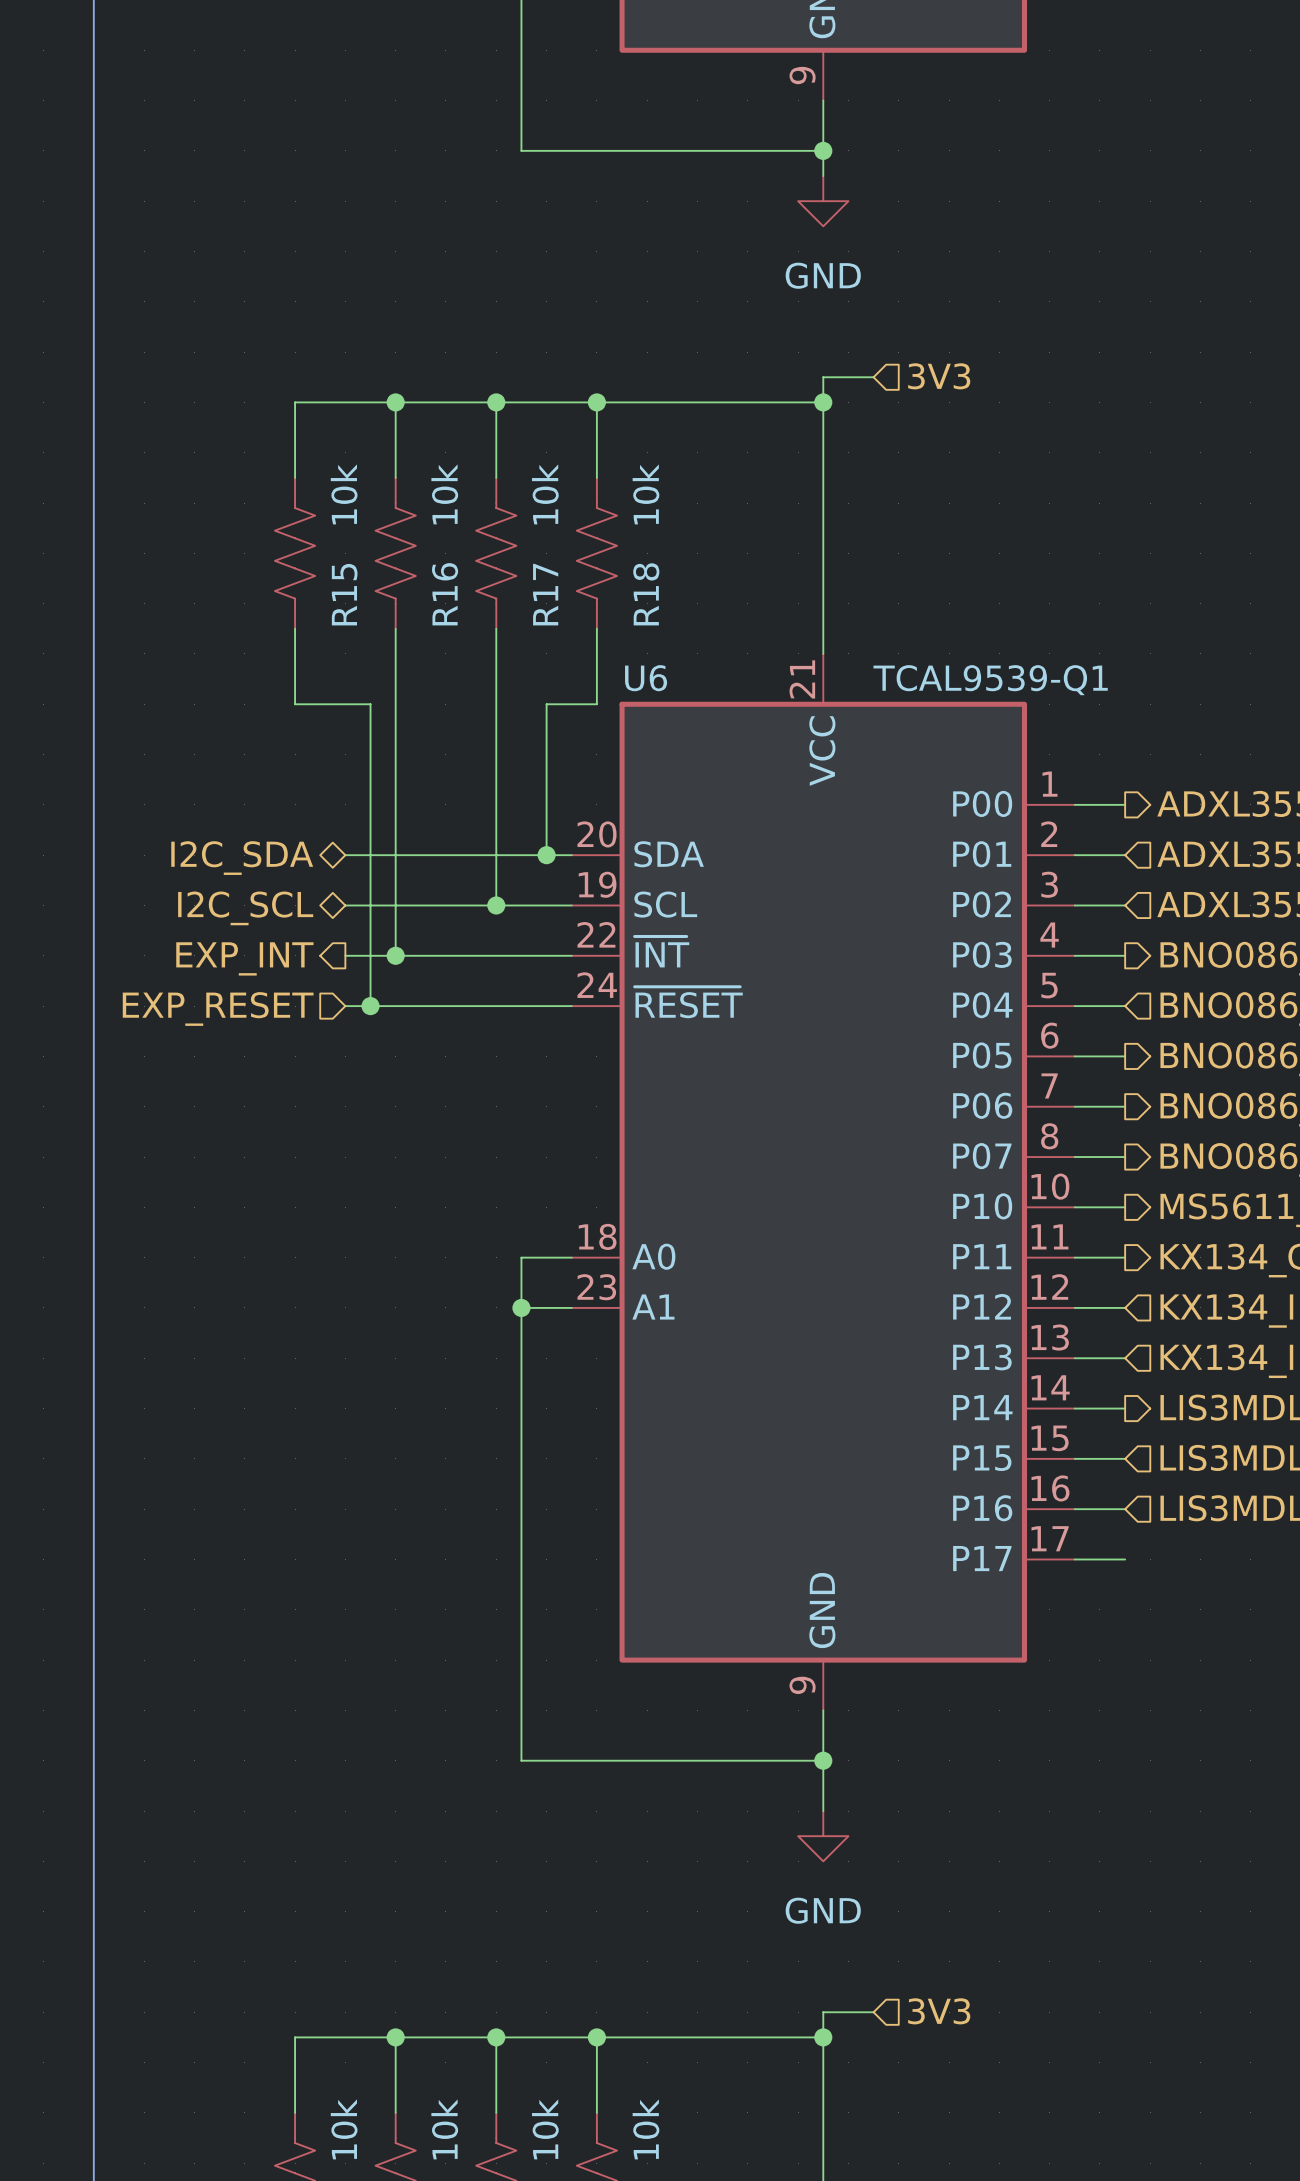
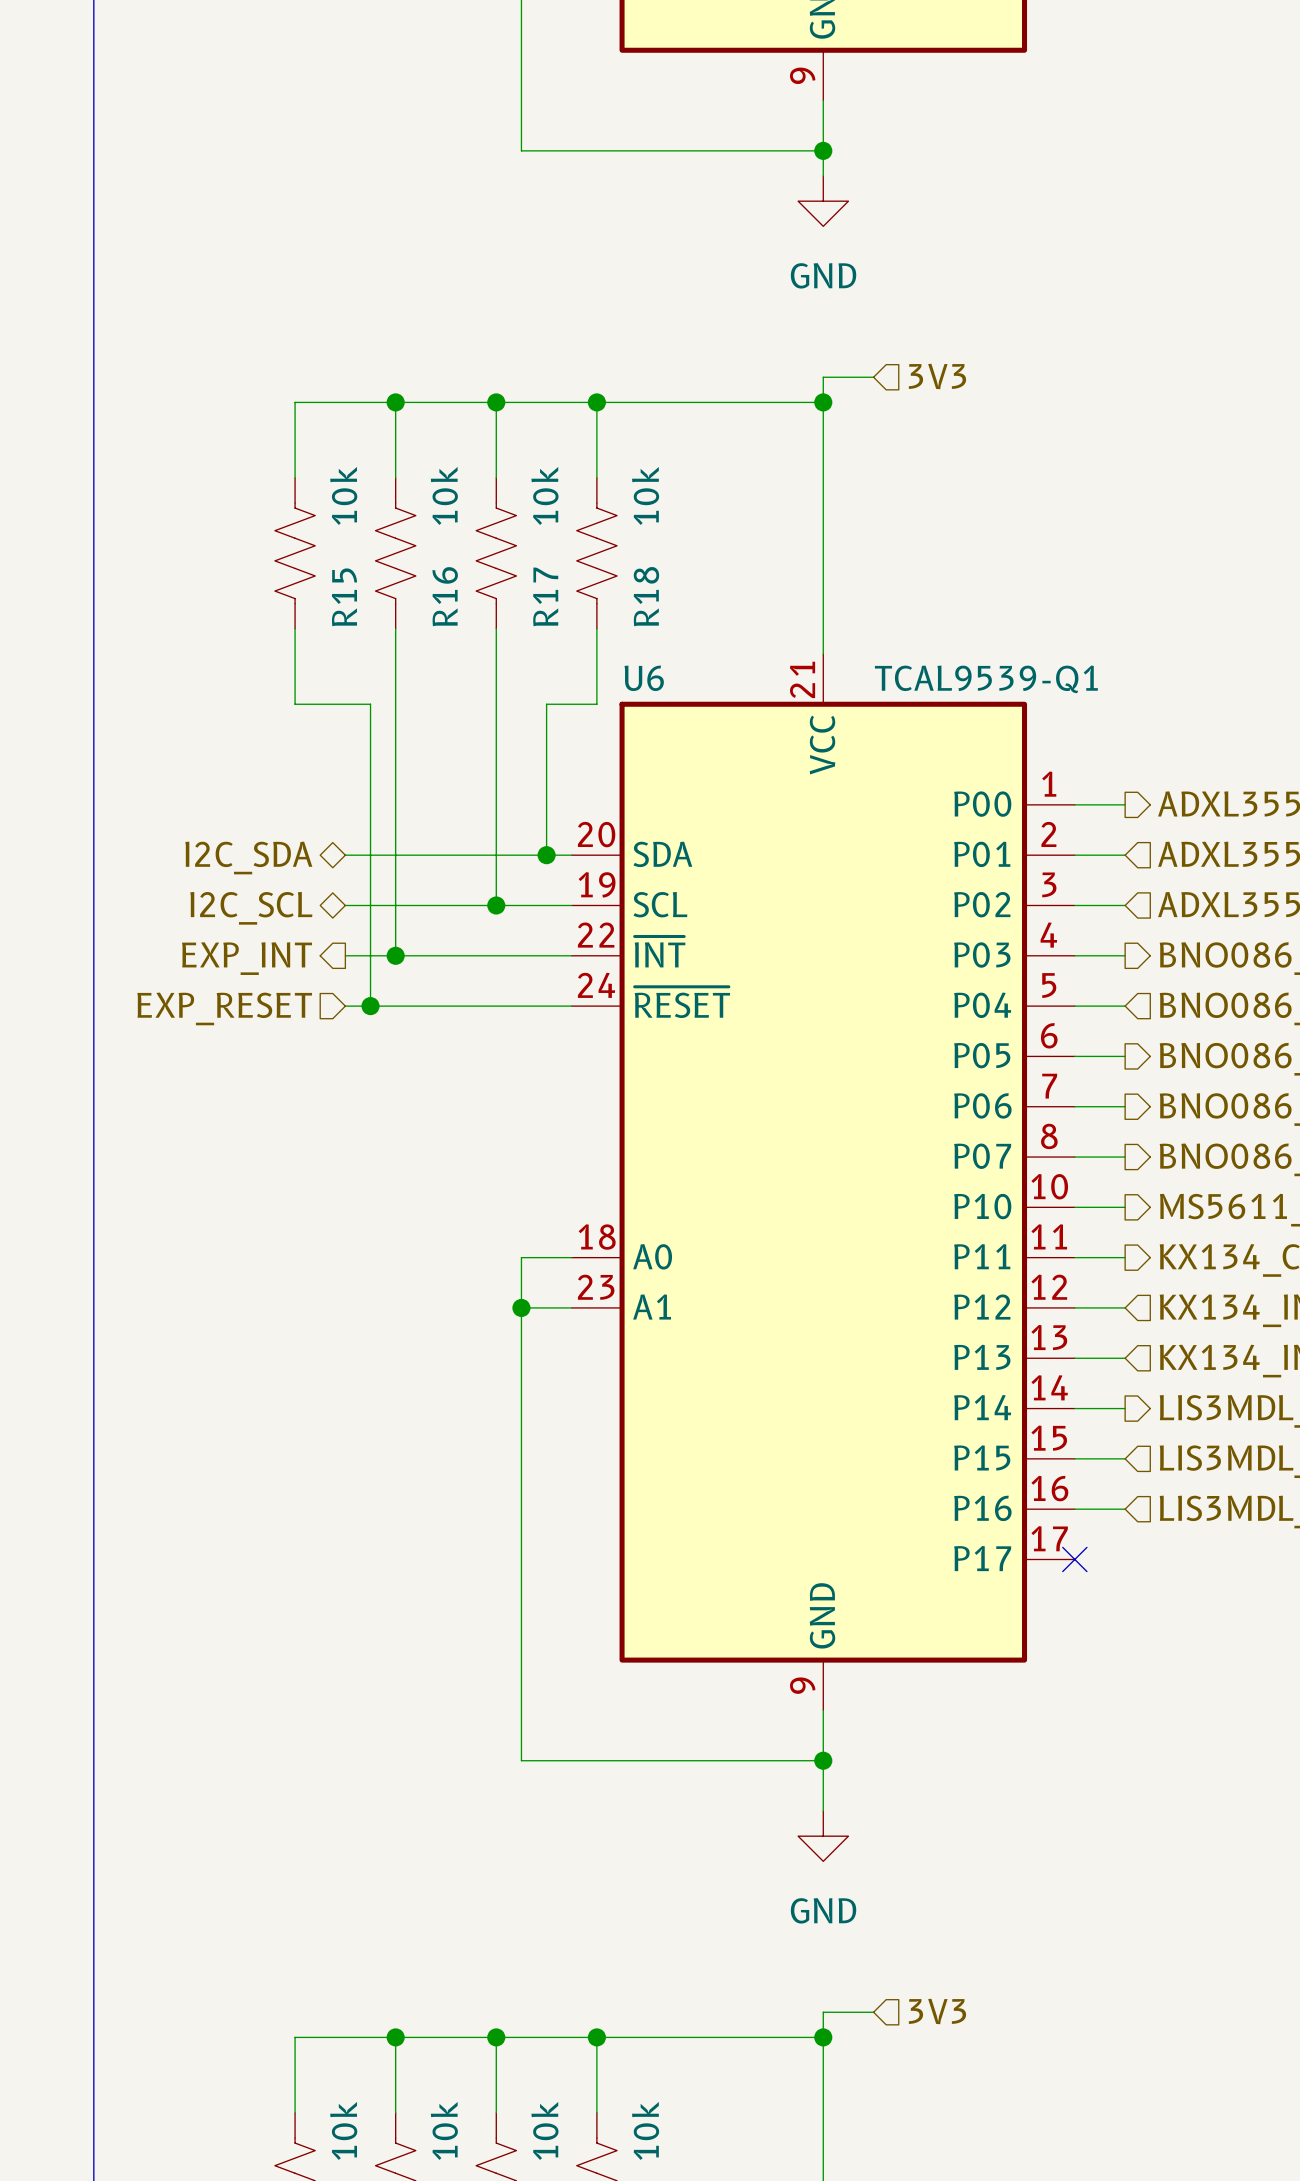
wire: (1074, 1559) (1125, 1559) -> none
no-connect mark: none -> (1074, 1559)

